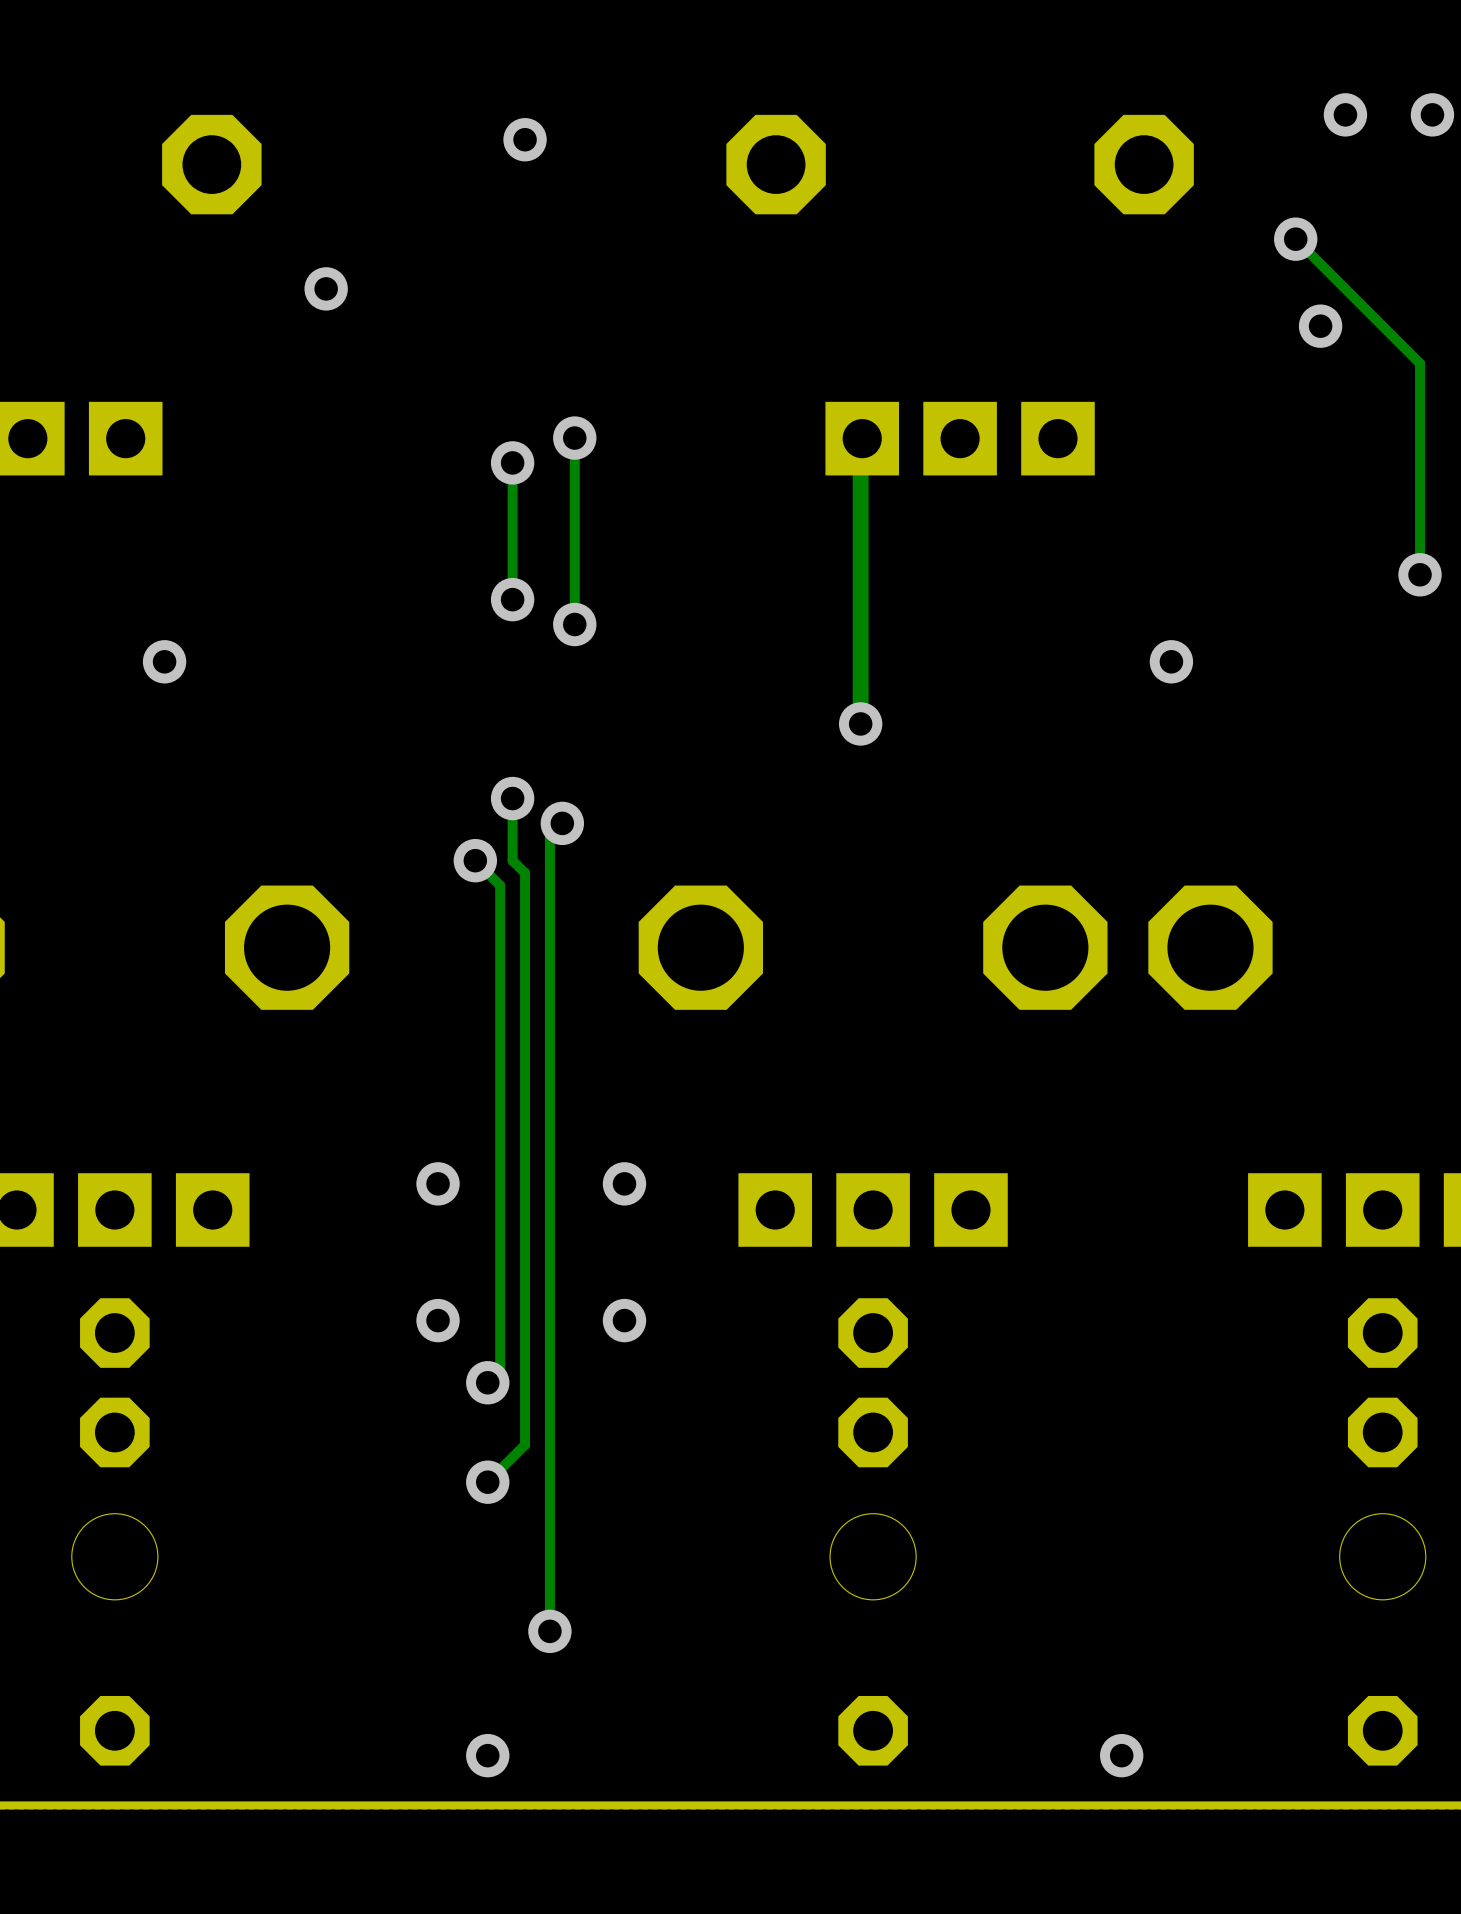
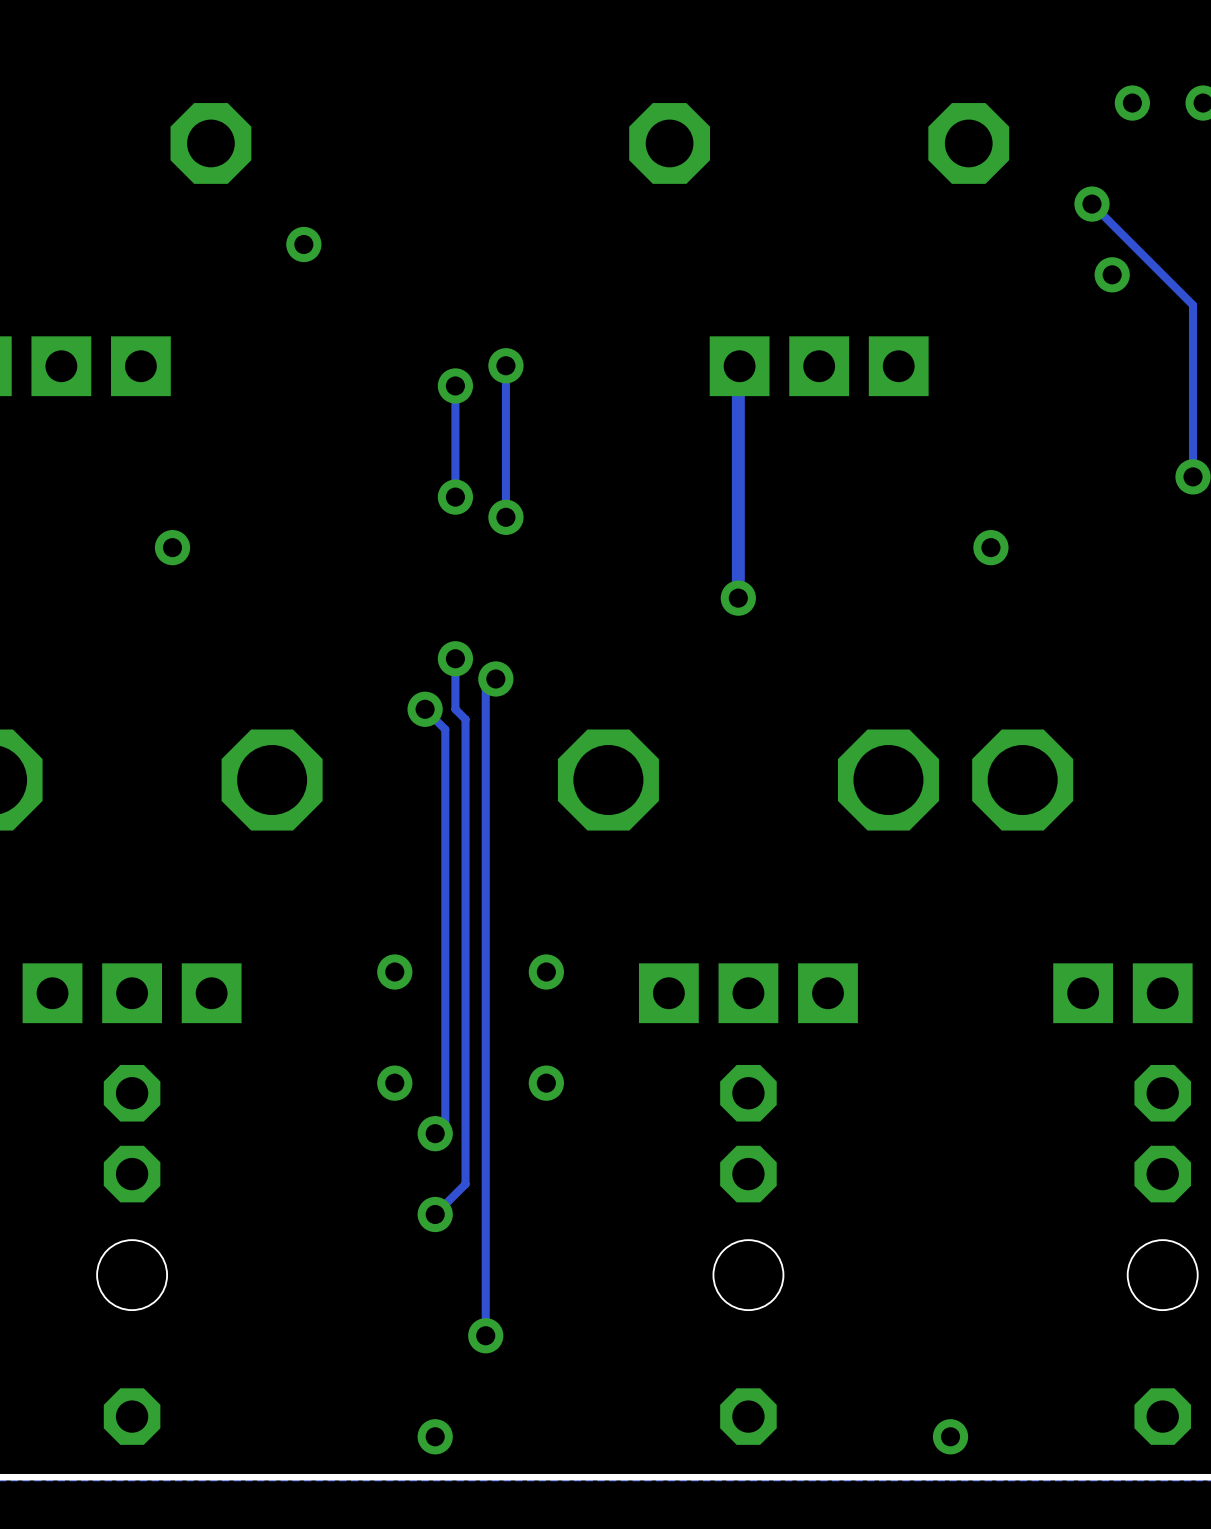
via: (525, 139) -> none

